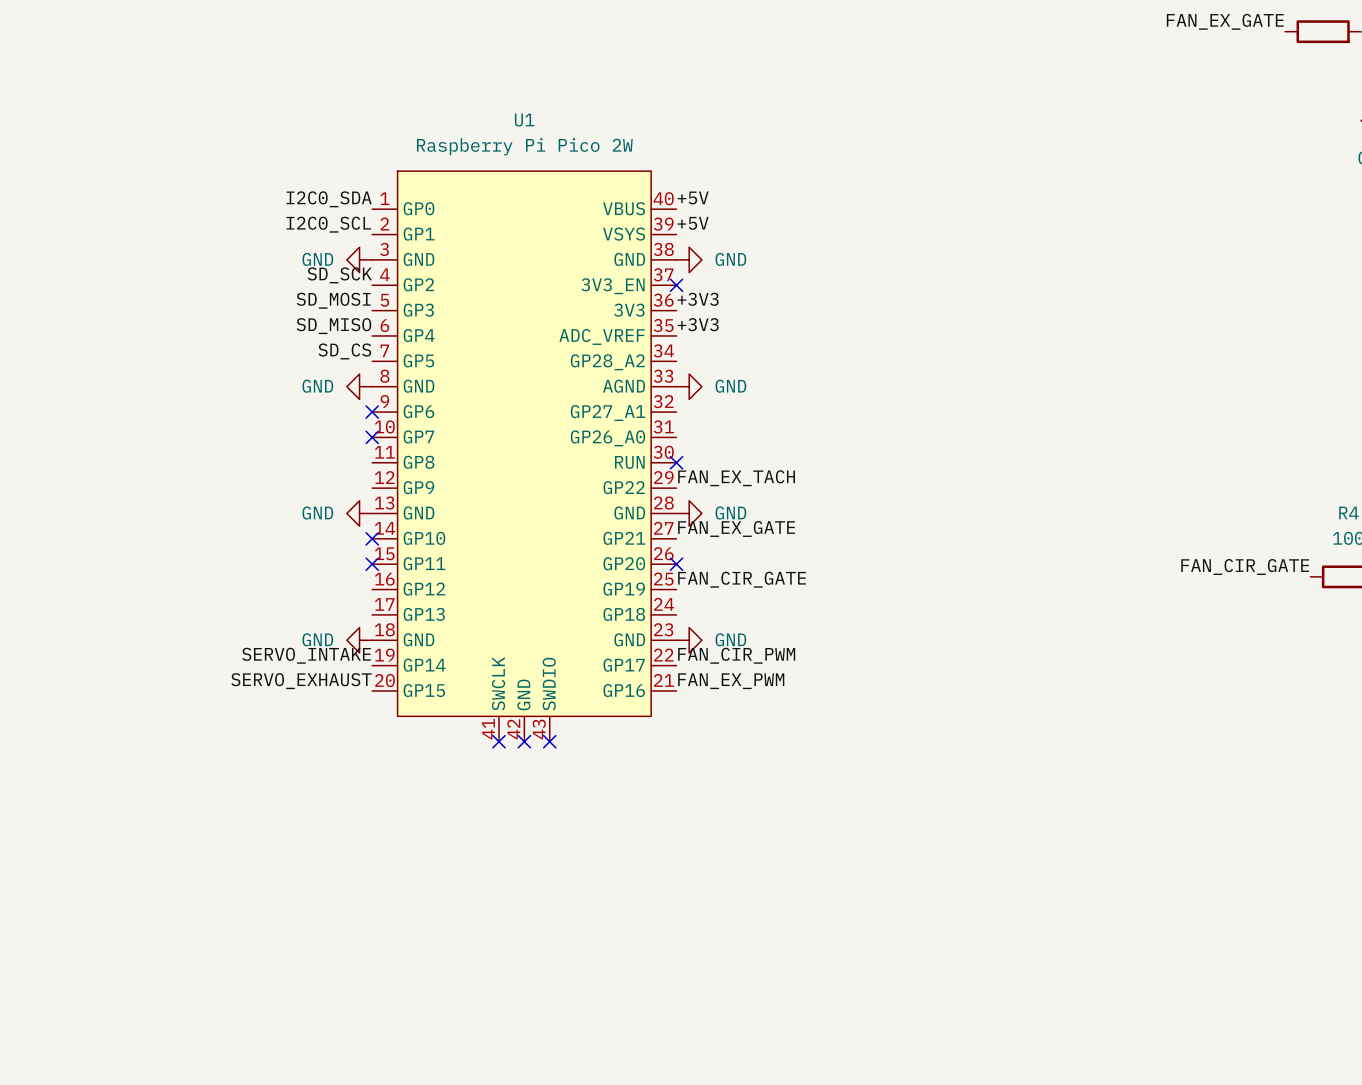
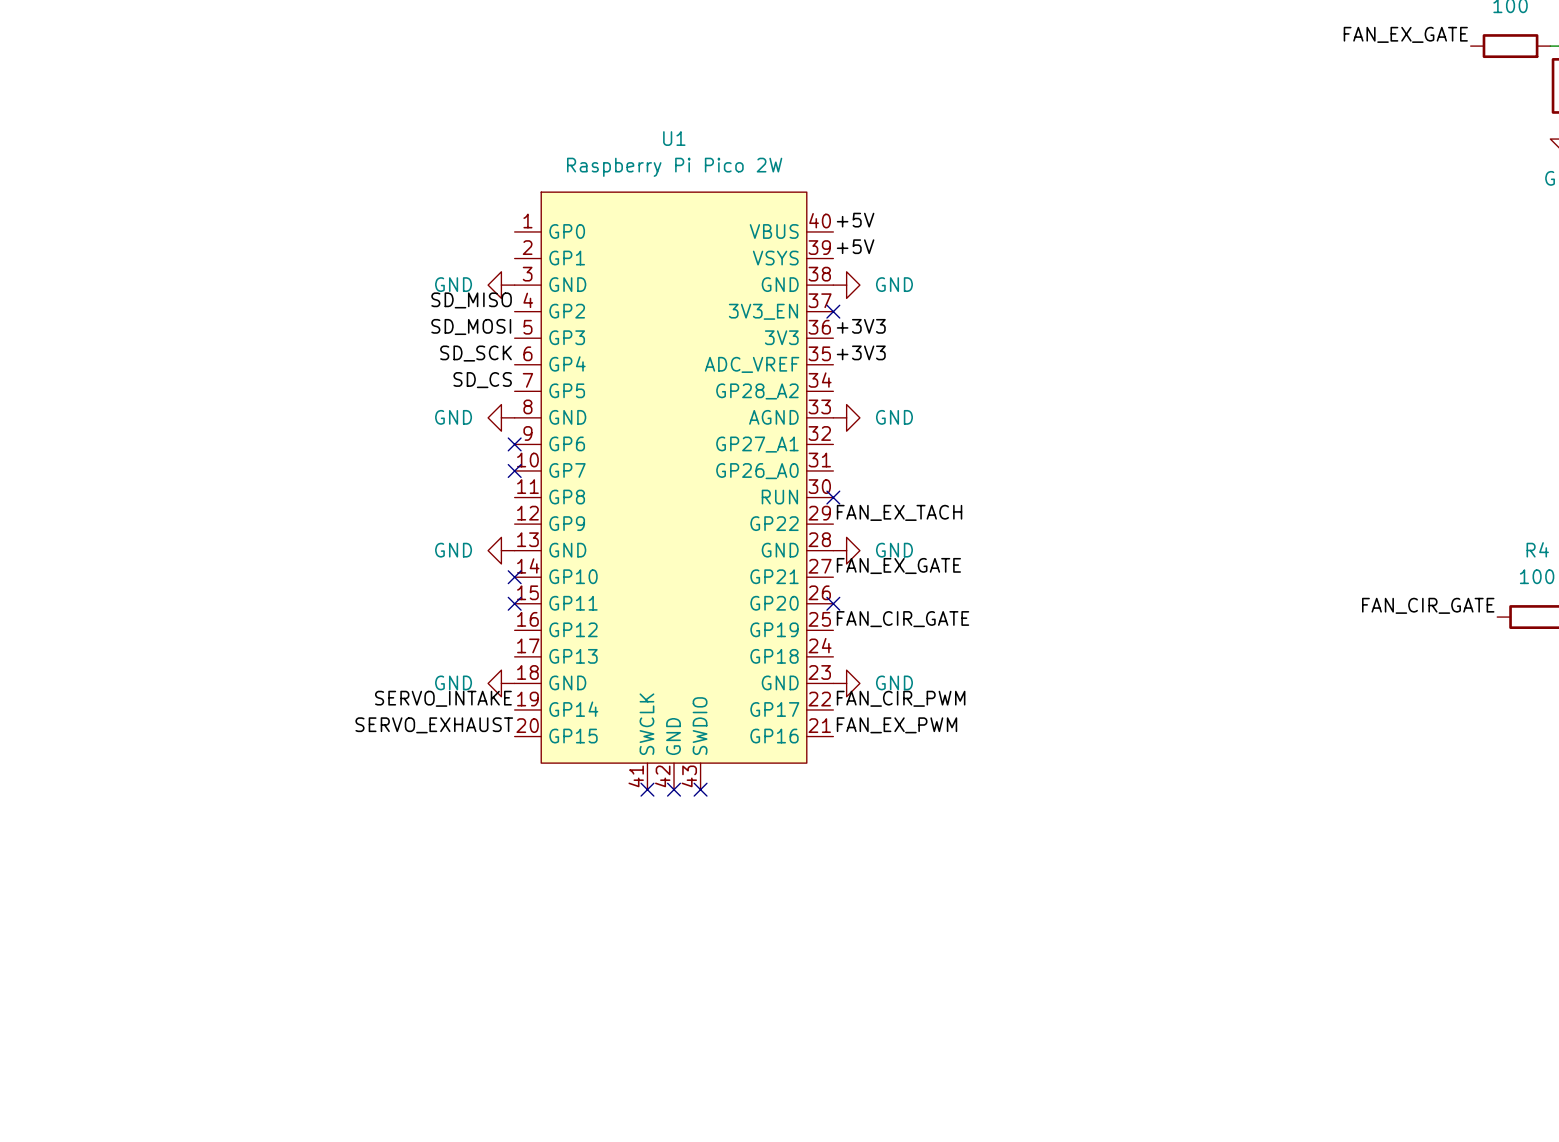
label: I2C0_SDA (329, 199) -> none
label: I2C0_SCL (328, 224) -> none
label: SD_SCK (339, 275) -> SD_MISO (471, 300)
label: SD_MISO (333, 326) -> SD_SCK (476, 353)

